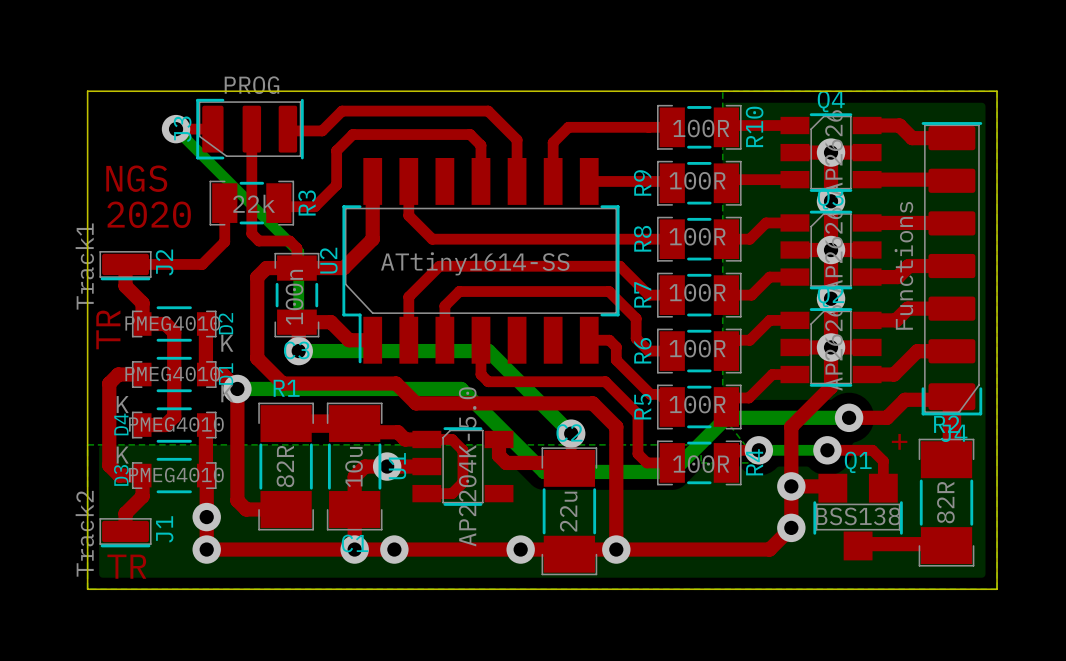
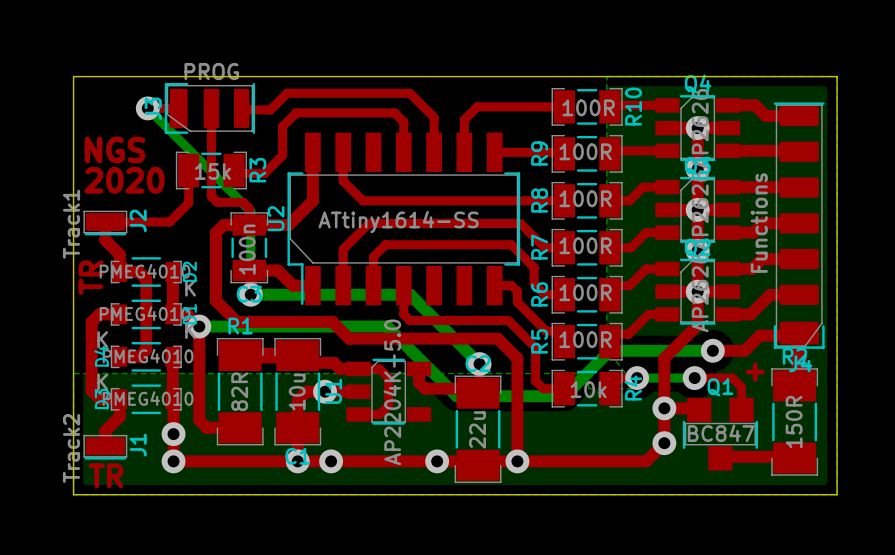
R3 value: 22k (254, 203) -> 15k (212, 171)
R4 value: 100R (701, 464) -> 10k (588, 389)
R2 value: 82R (945, 502) -> 150R (794, 421)
Q1 value: BSS138 (858, 516) -> BC847 (721, 433)

